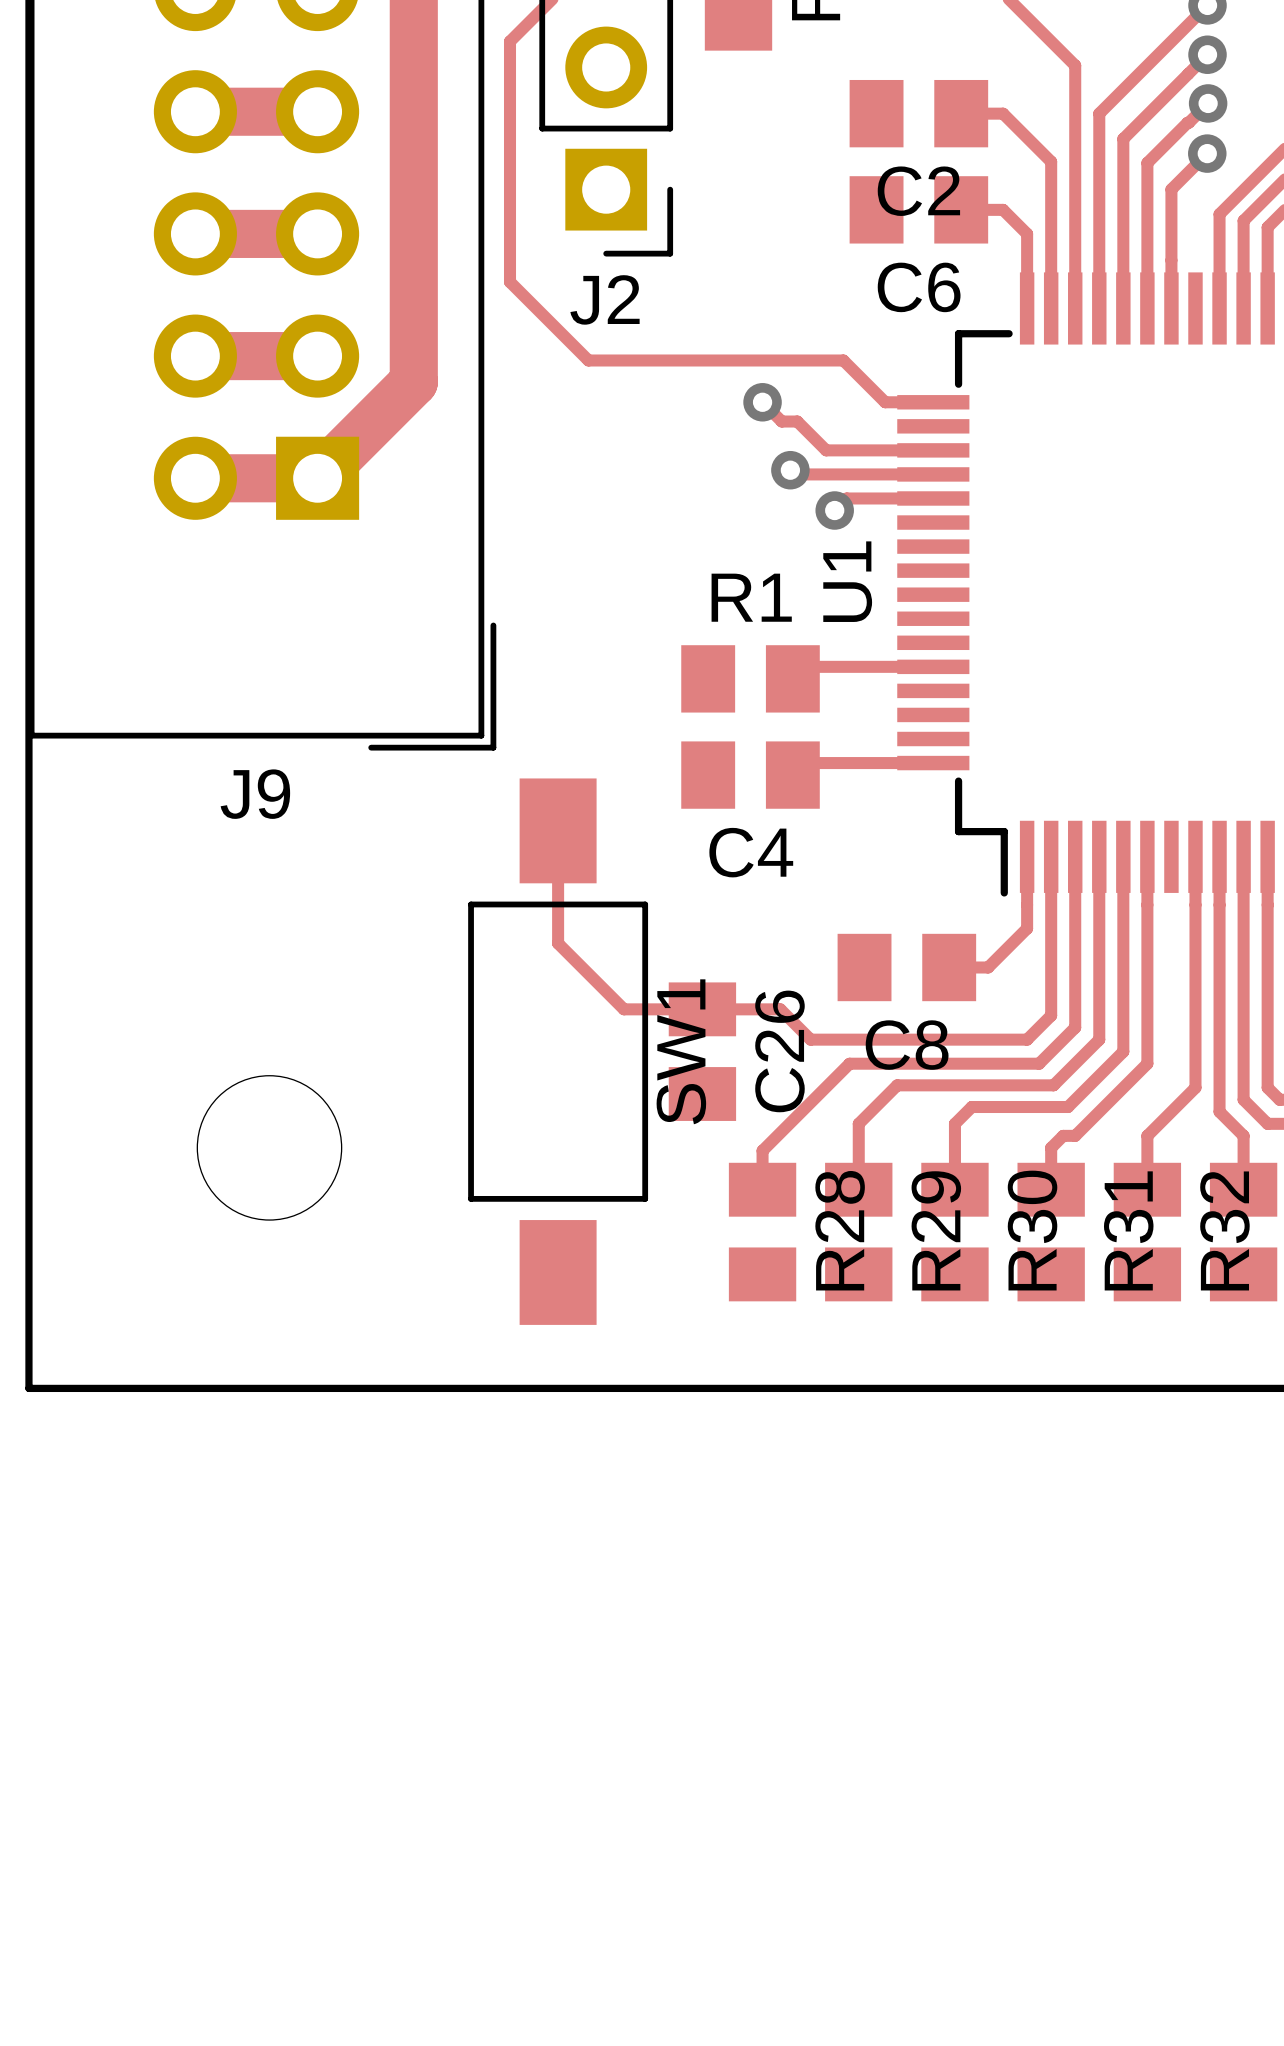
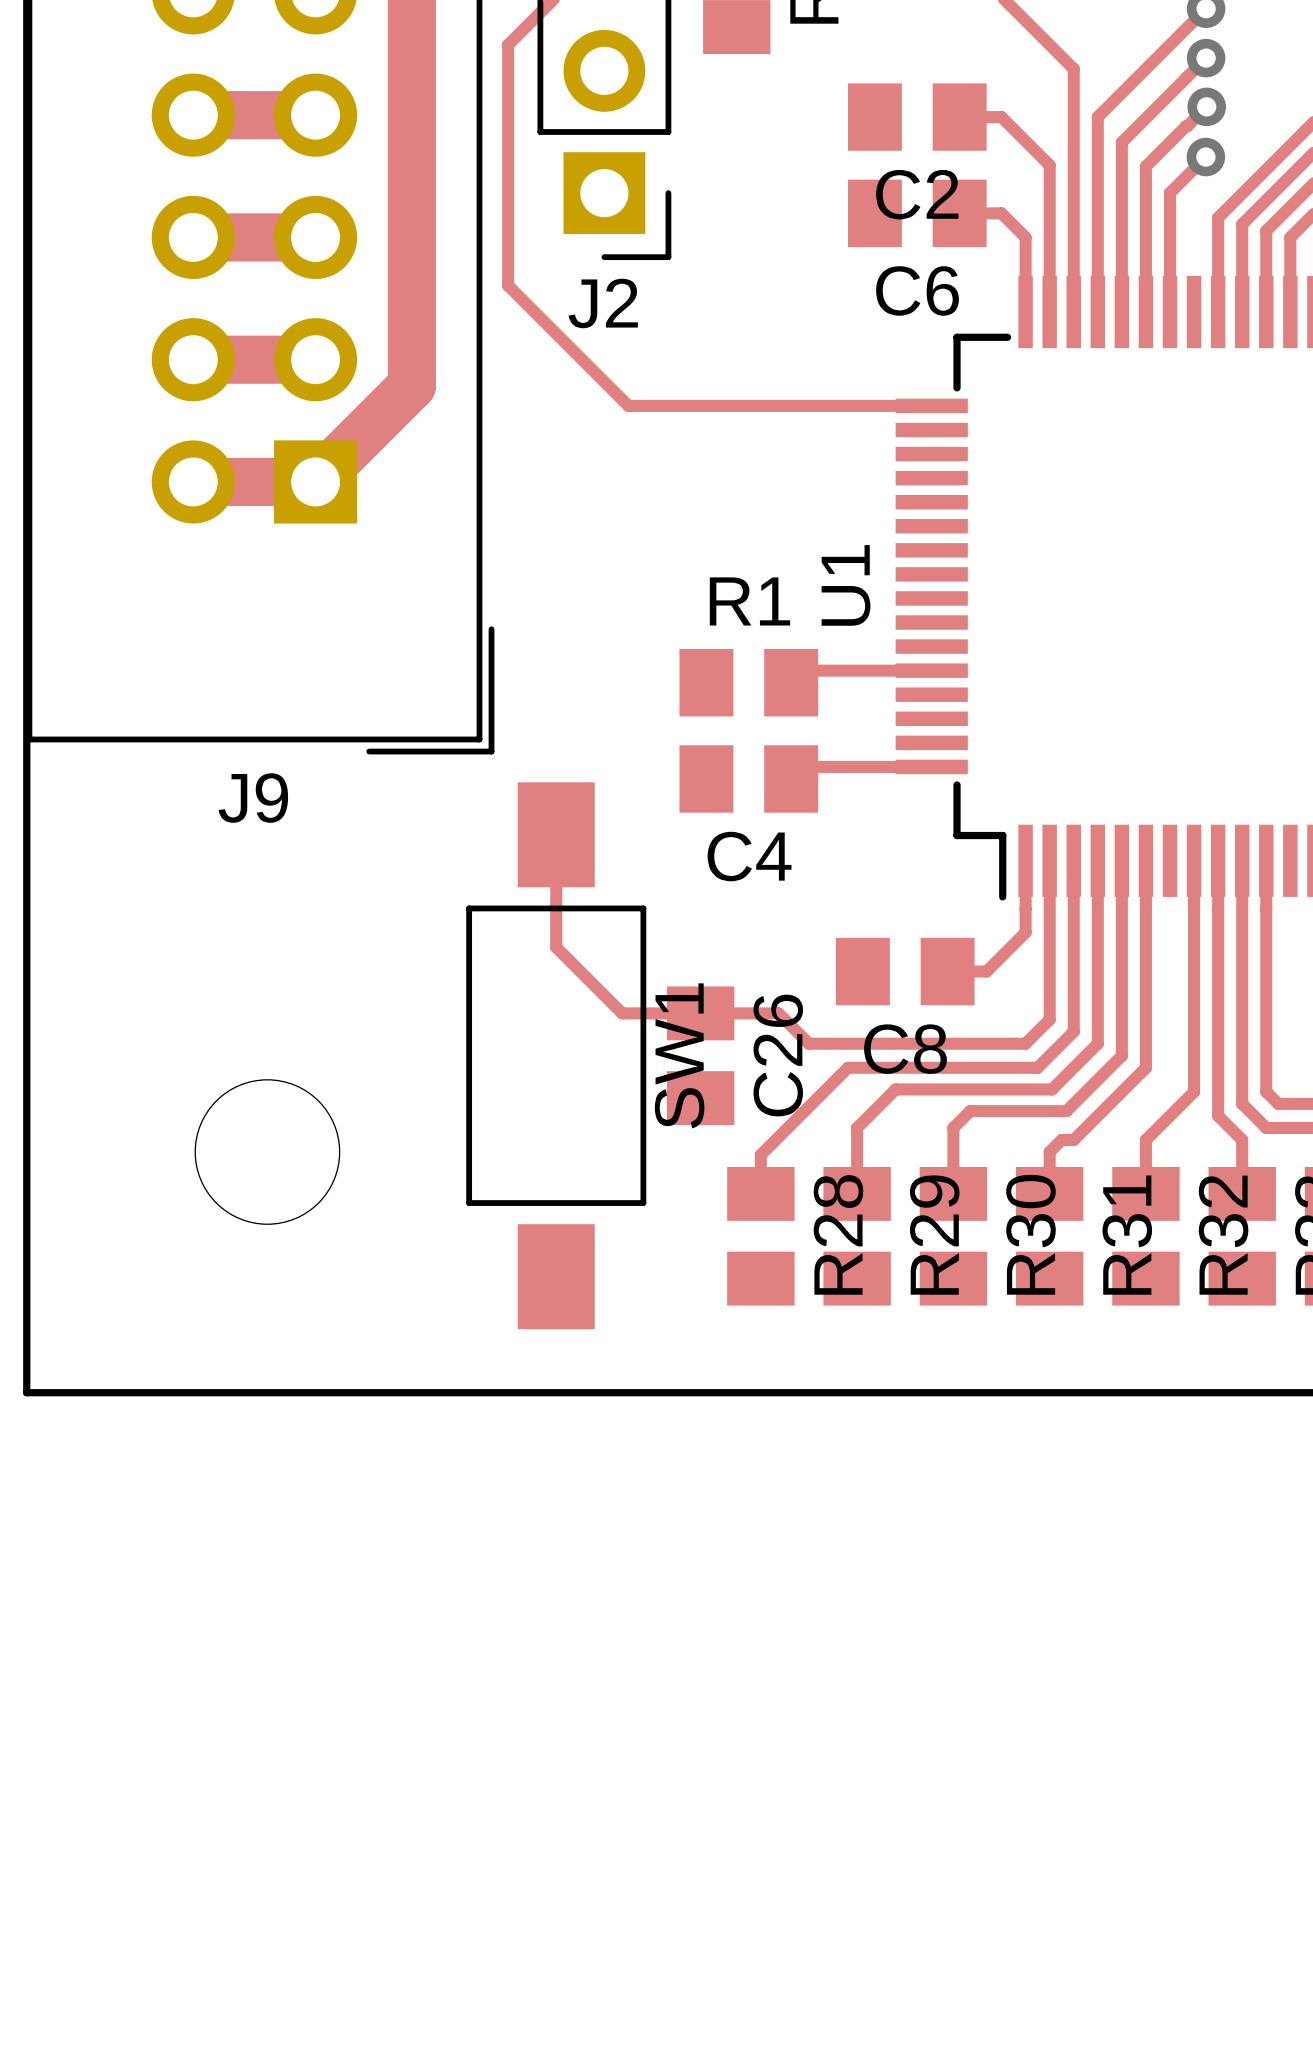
track: (588, 360) (843, 360) (885, 402) -> (586, 364) (628, 405) (883, 405)
track: (762, 402) (781, 421) (797, 421) (826, 450) (933, 450) -> none
via: (762, 402) -> none
track: (790, 470) (794, 474) (933, 474) -> none
via: (790, 470) -> none
track: (933, 498) (846, 498) (834, 510) -> none
via: (834, 510) -> none

